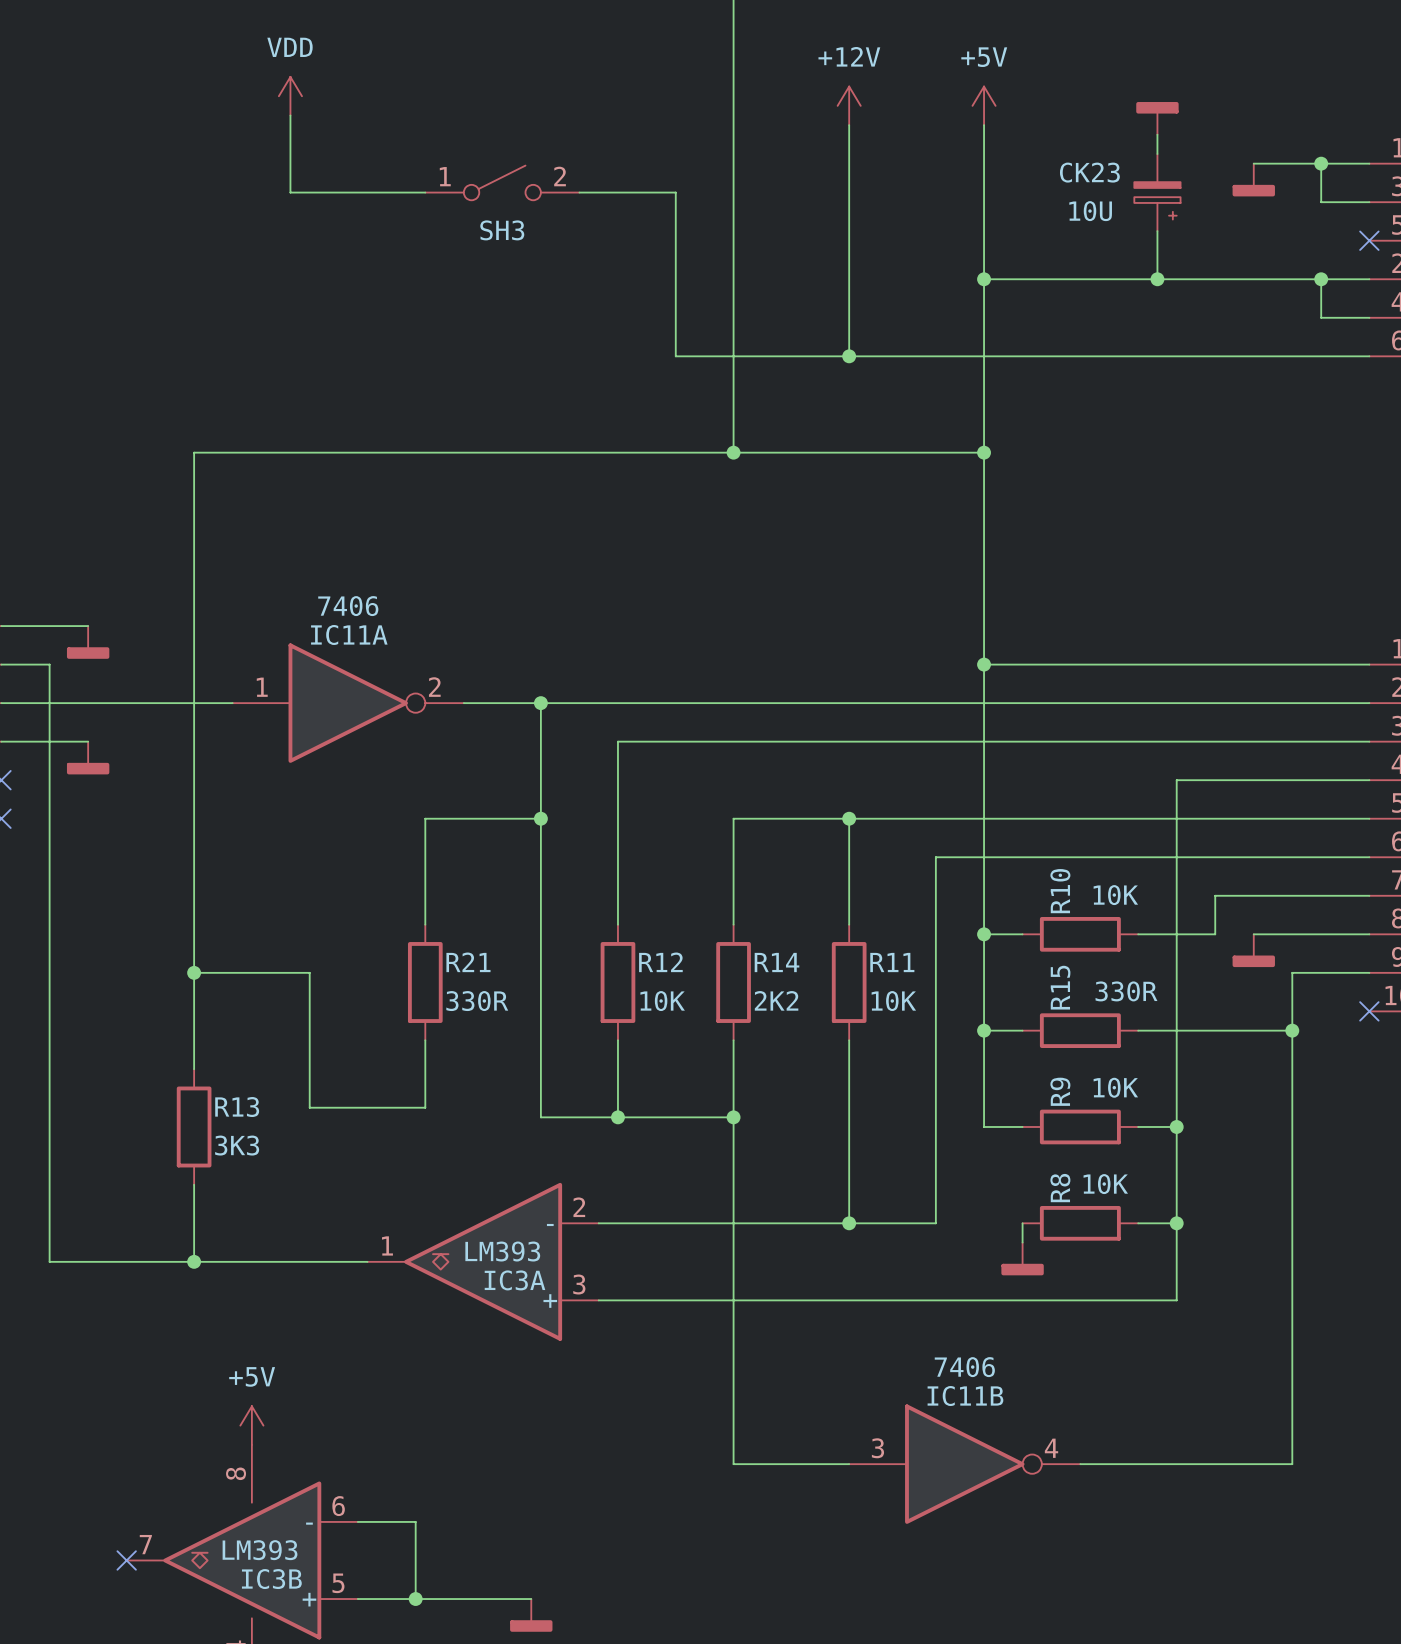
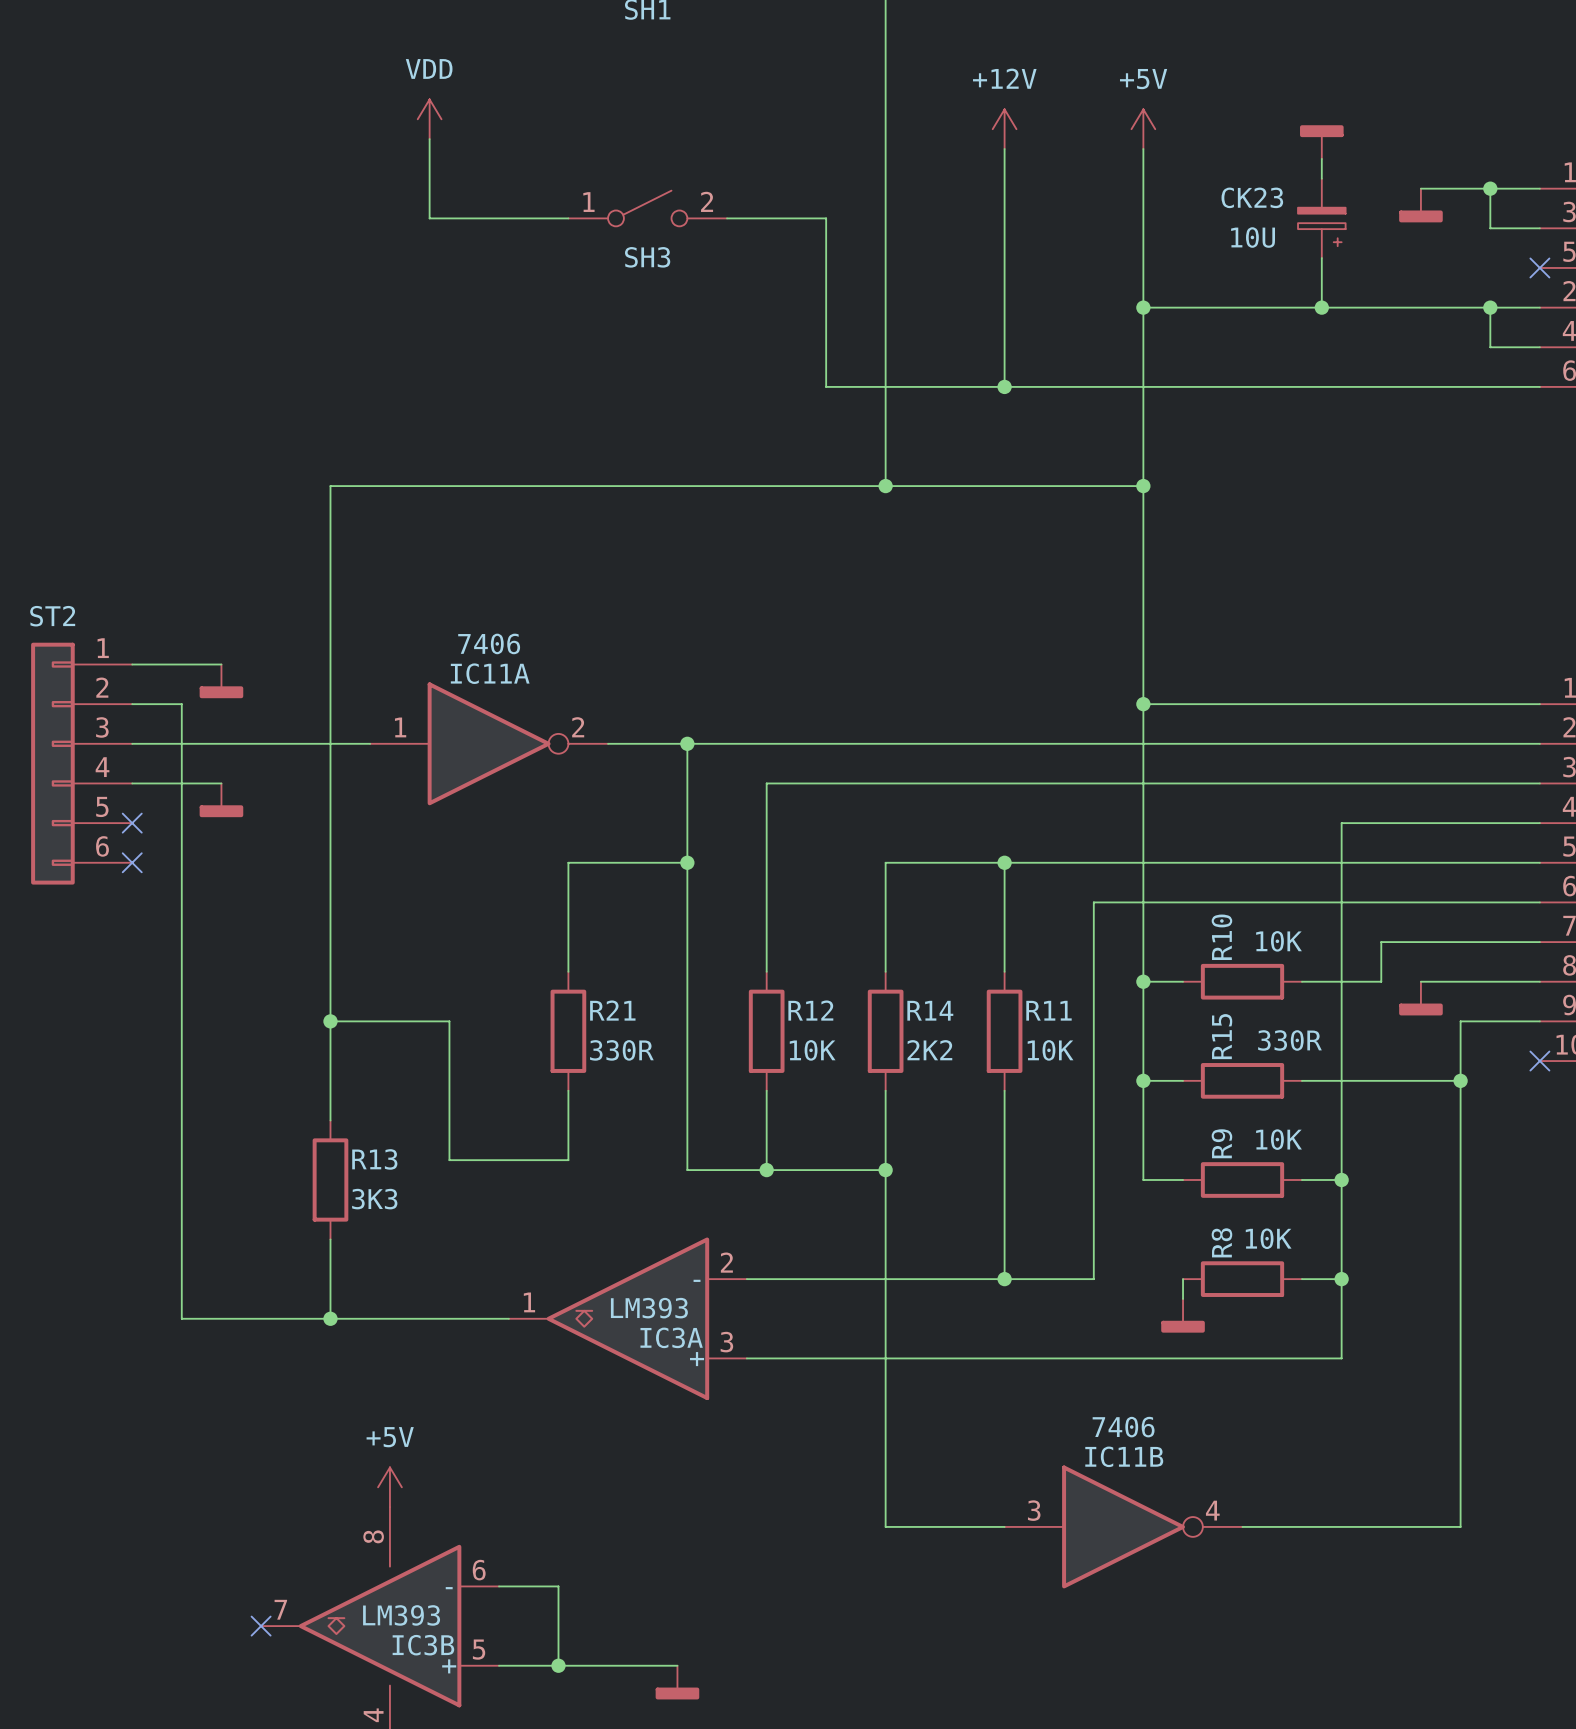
IC3A value position: LM393 (502, 1251) -> LM393 (649, 1308)
IC3A name position: IC3A (514, 1280) -> IC3A (671, 1337)
IC3B value position: LM393 (260, 1550) -> LM393 (401, 1615)
IC3B name position: IC3B (271, 1579) -> IC3B (423, 1645)

